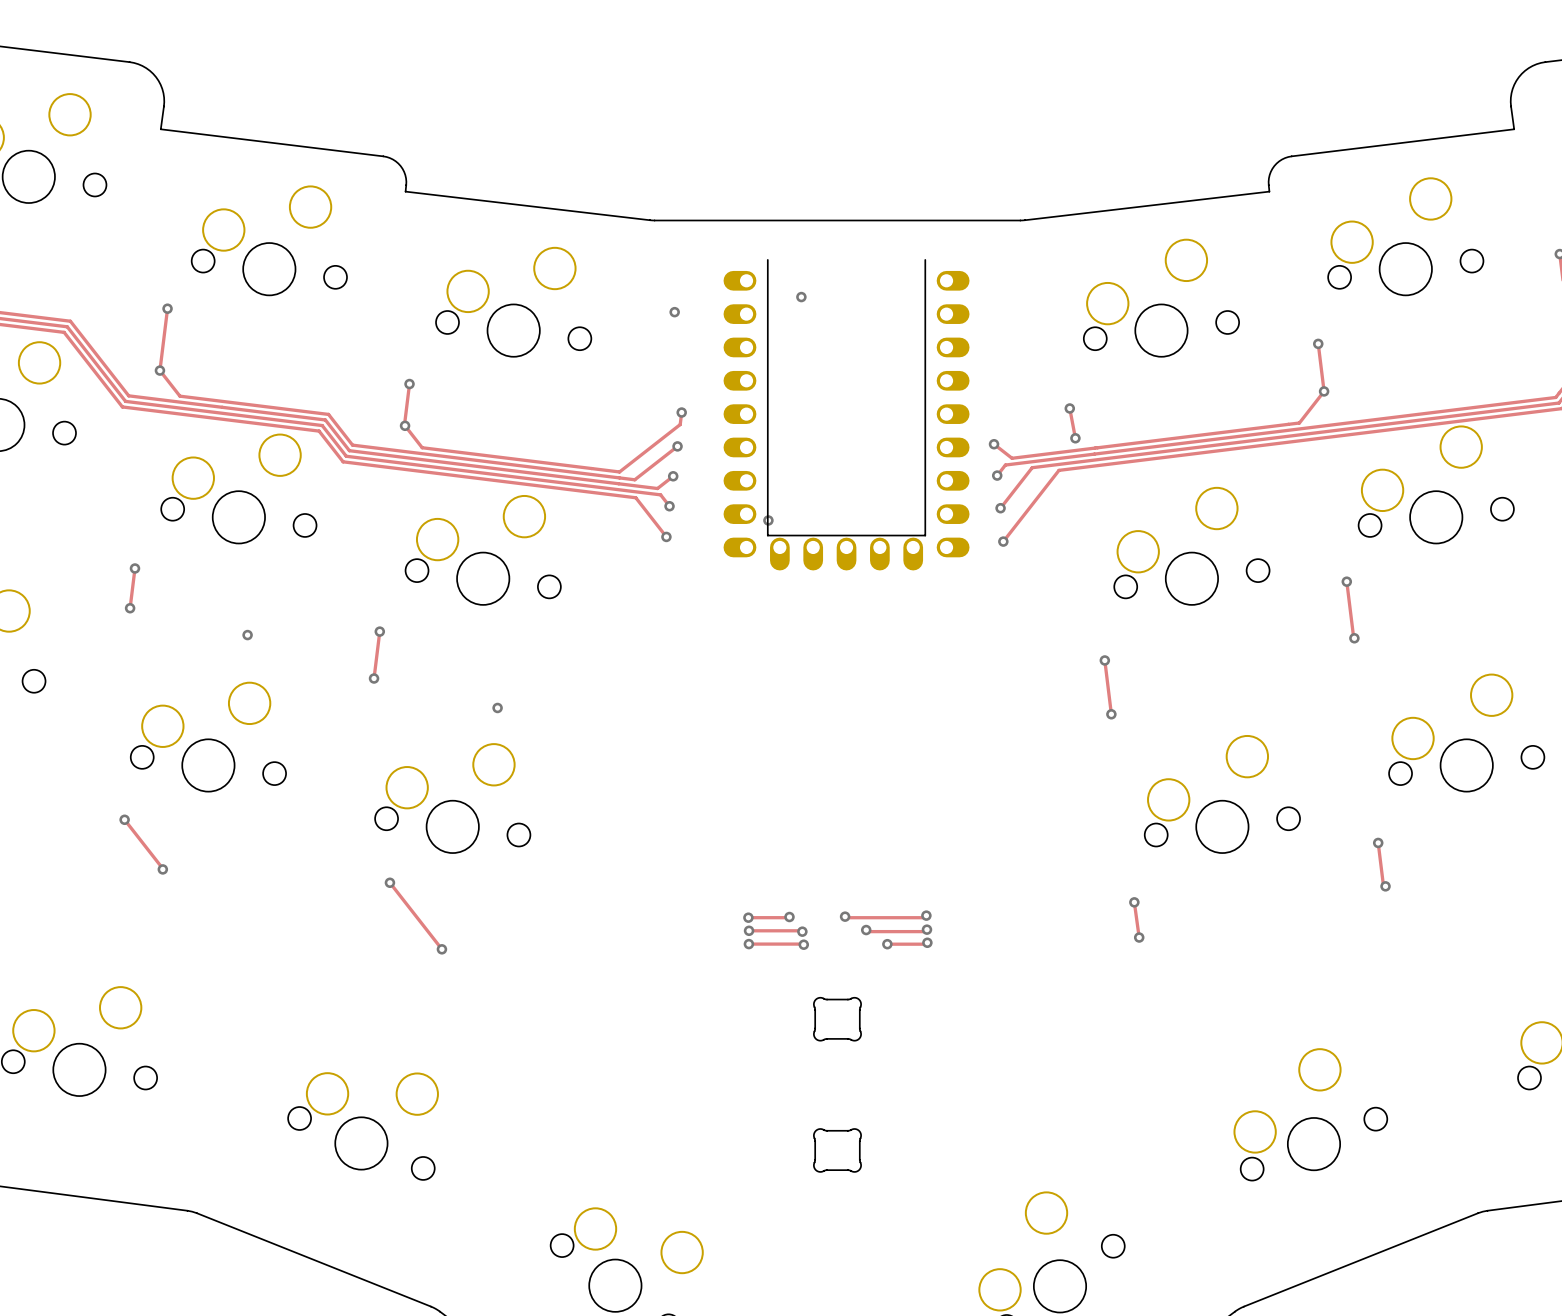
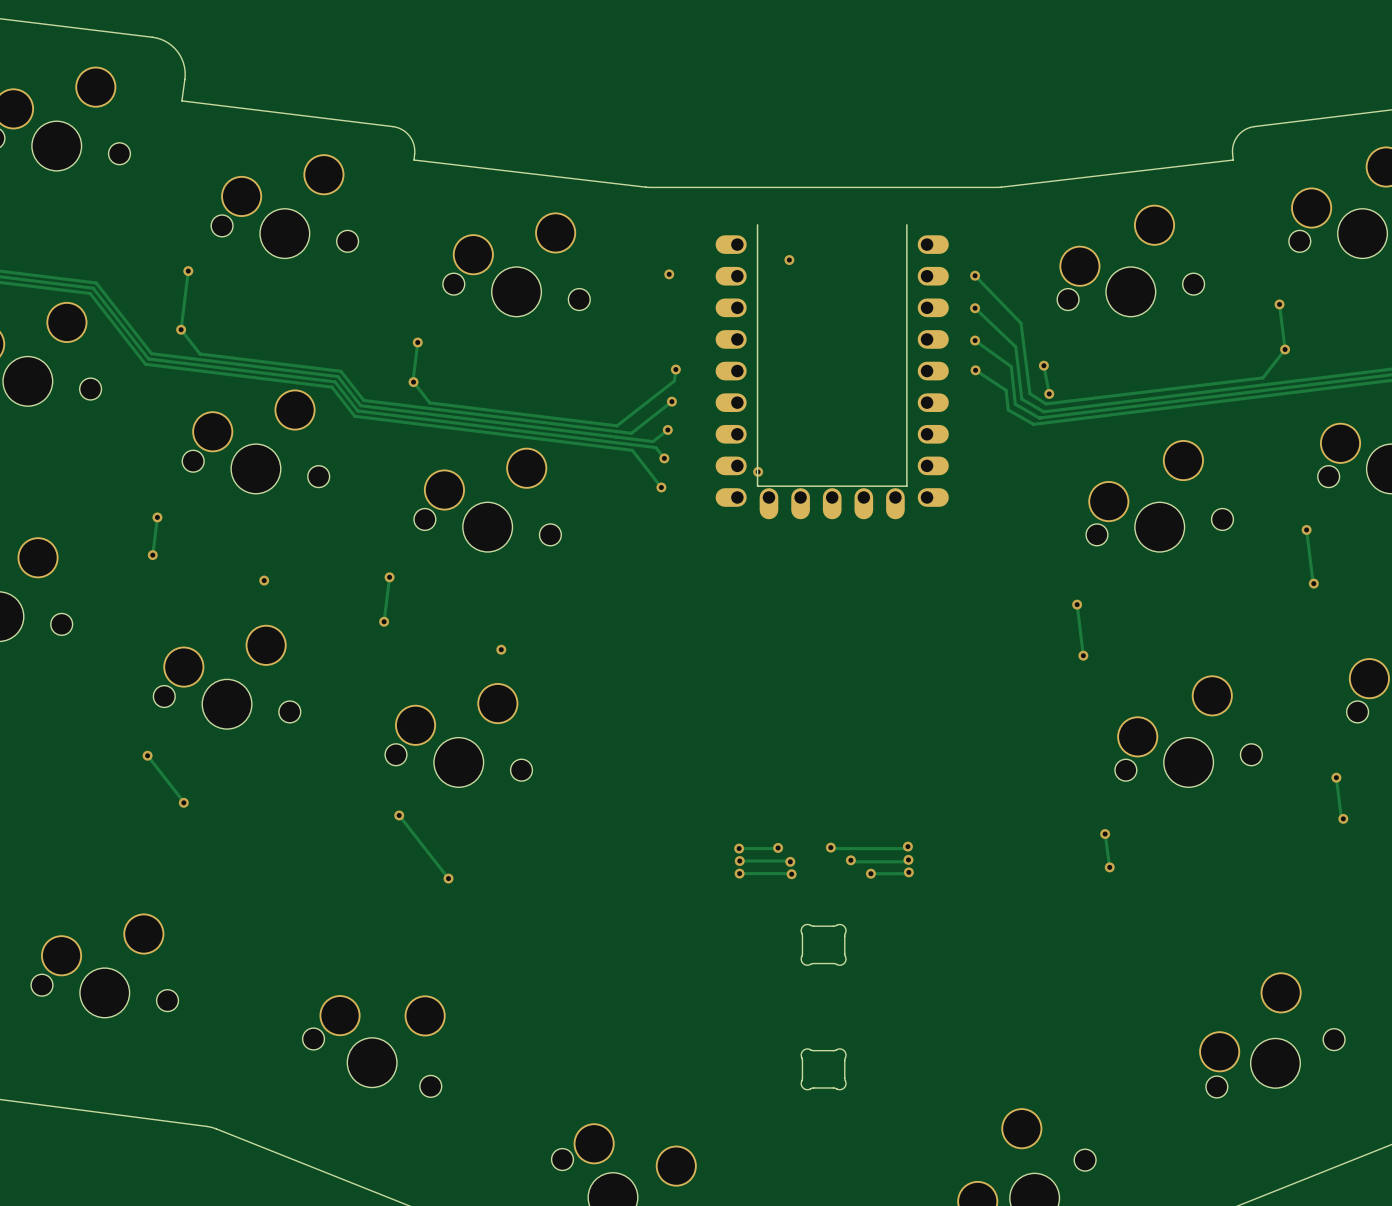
via: none -> (975, 275)
via: none -> (975, 308)
via: none -> (975, 340)
via: none -> (975, 370)
track: (1300, 421) (1012, 458) (994, 444) -> (1262, 377) (1046, 403) (1029, 393) (1021, 323) (975, 275)
via: (994, 444) -> none
track: (1069, 457) (1005, 465) (997, 475) -> (1043, 411) (1021, 399) (1015, 346) (975, 308)
track: (1066, 463) (1032, 467) (1000, 508) -> (1040, 417) (1015, 404) (1011, 366) (975, 340)
track: (1058, 470) (1003, 541) -> (1033, 424) (1008, 410) (1006, 390) (975, 370)
via: (997, 475) -> none
via: (1000, 508) -> none
via: (1003, 541) -> none

